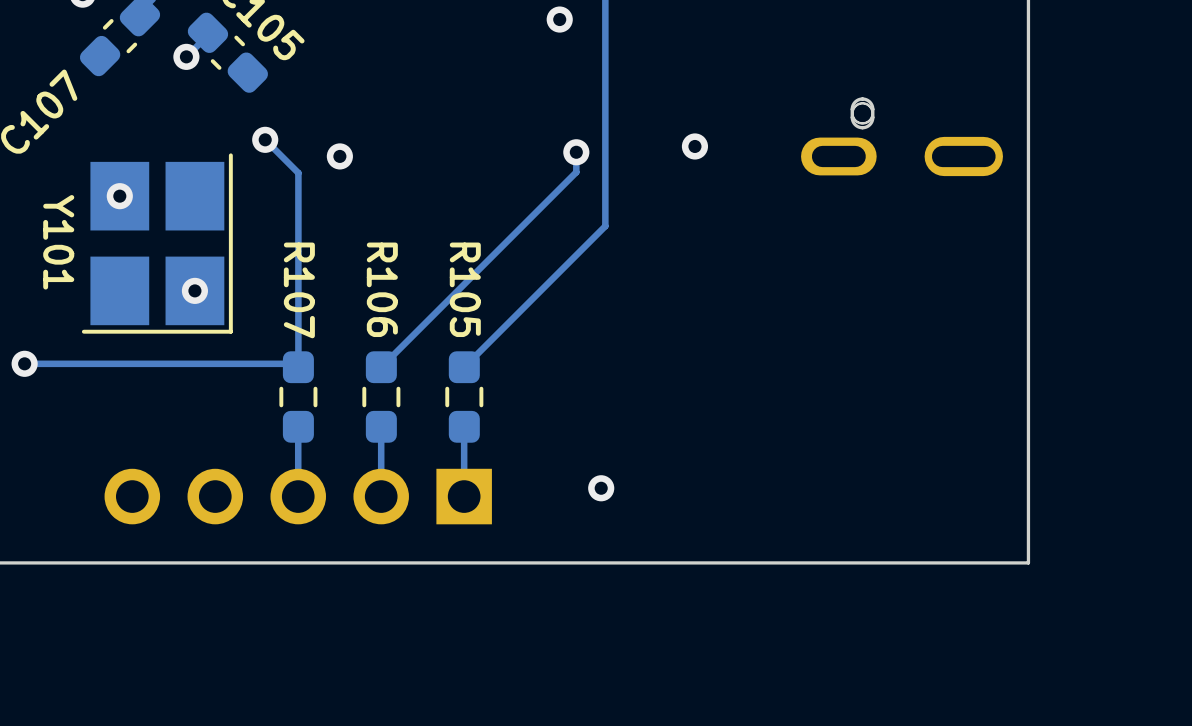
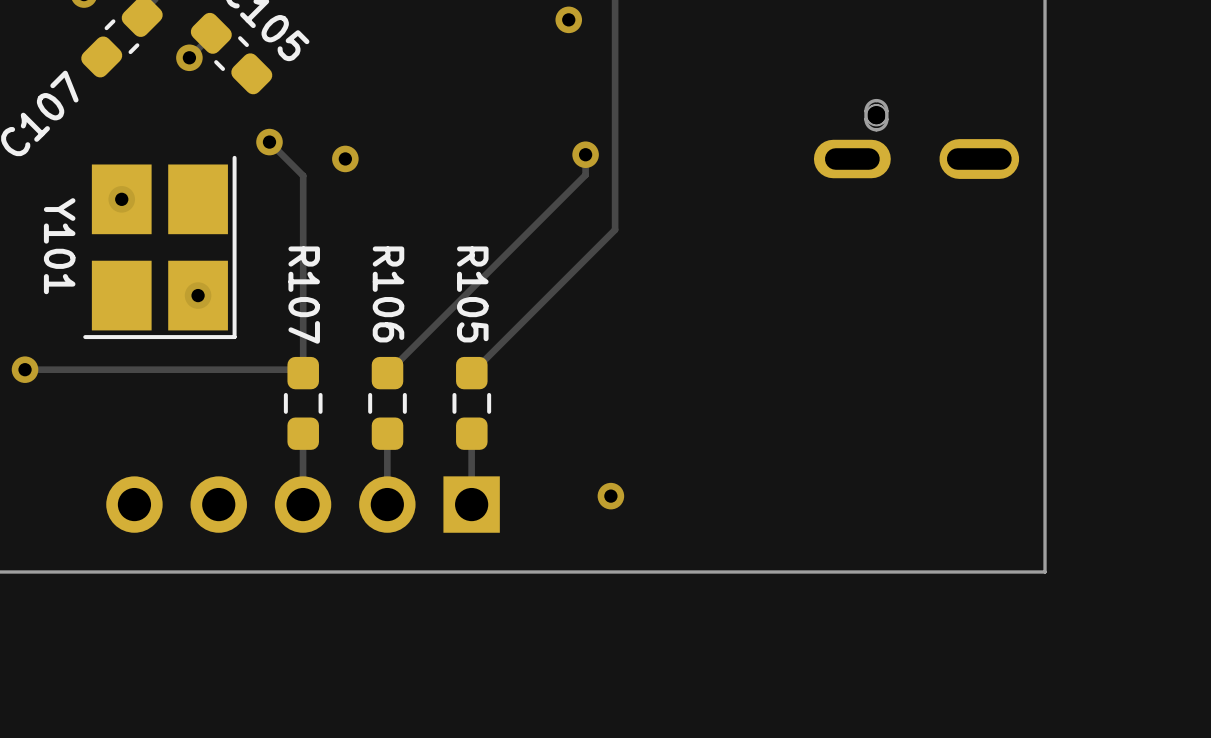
via: (694, 146) -> none

